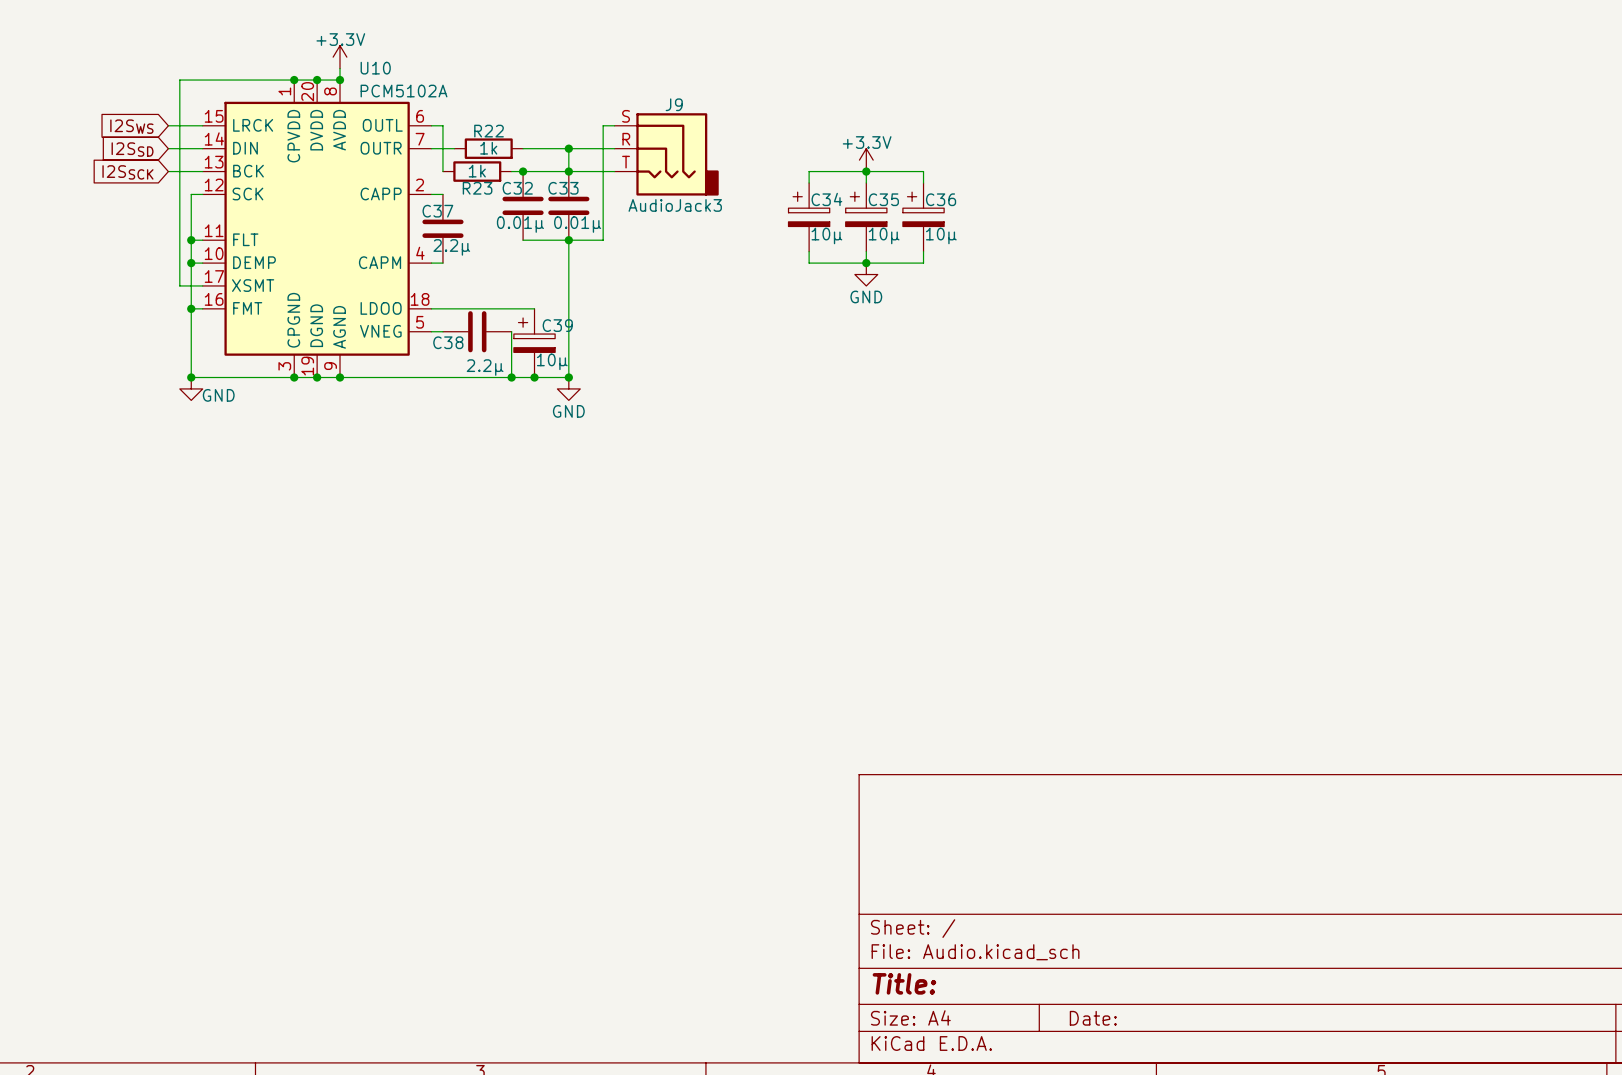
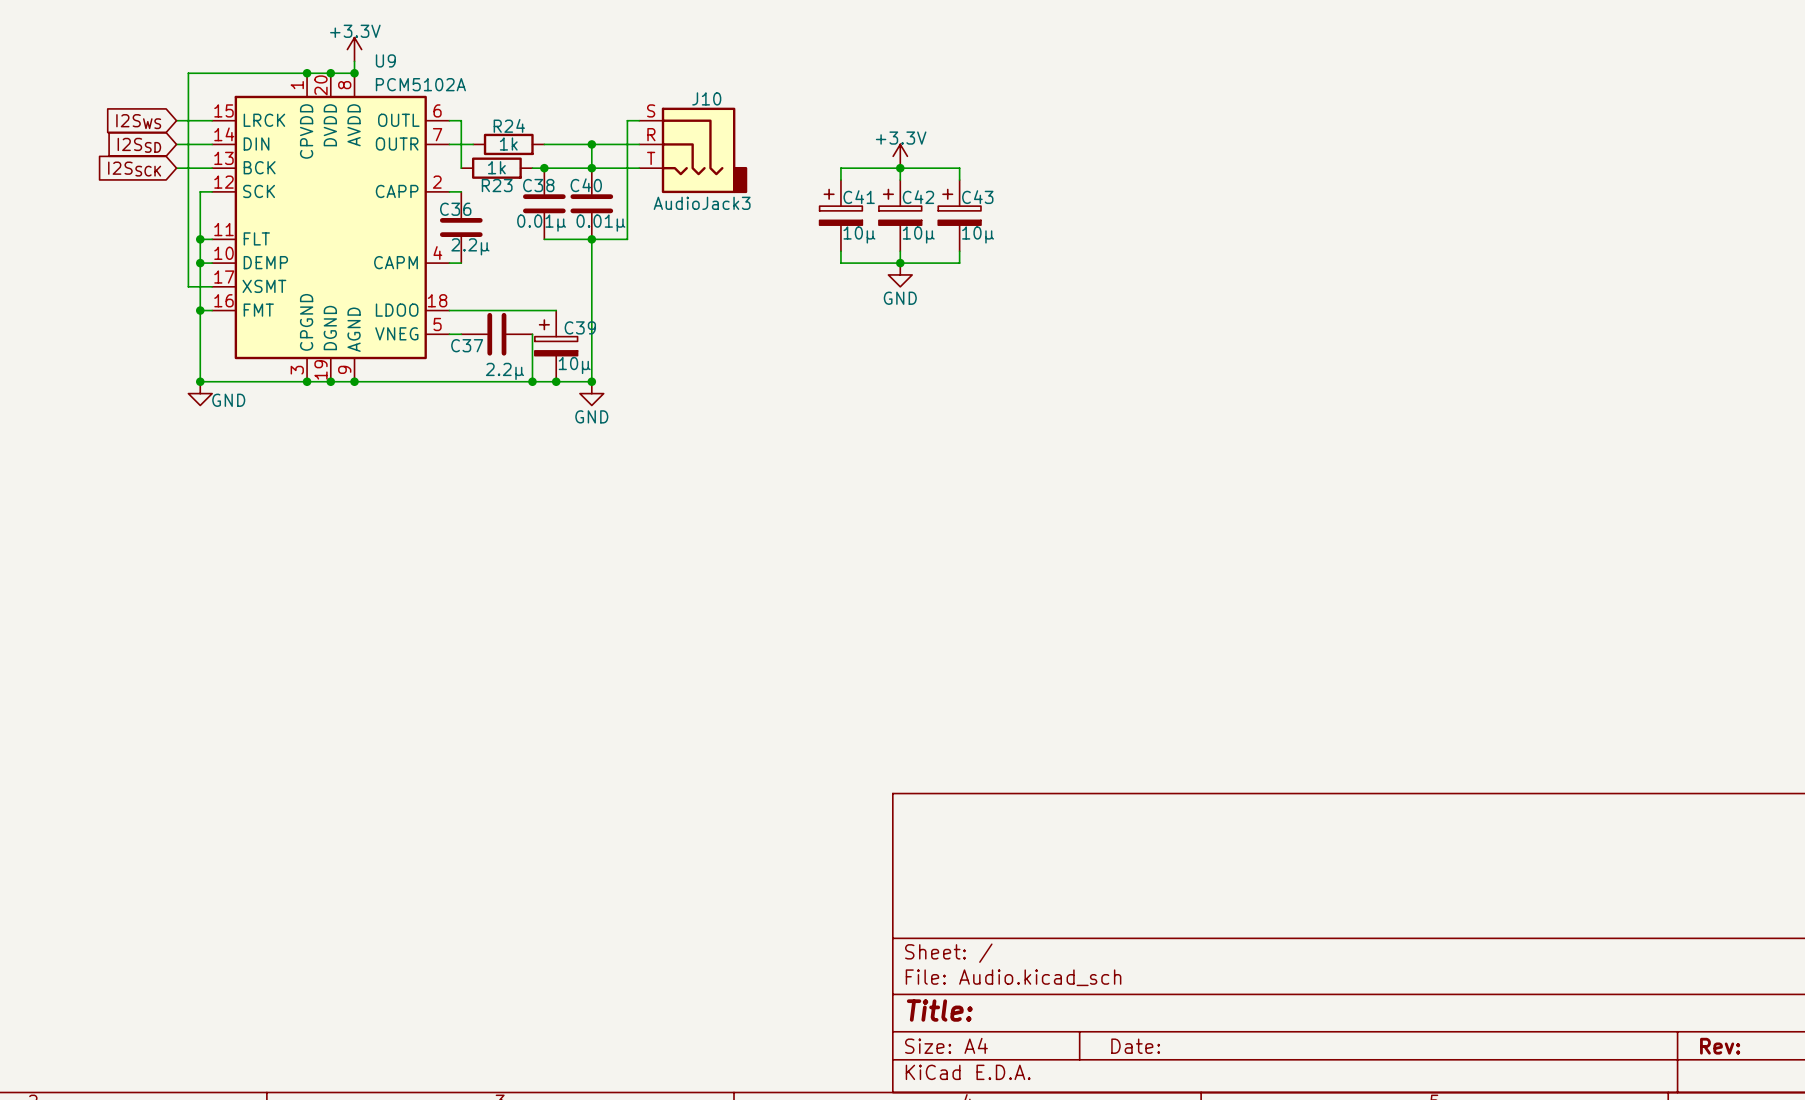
U10 name: U10 (375, 68) -> U9 (385, 60)
J9 name: J9 (674, 104) -> J10 (706, 98)
R22 name: R22 (489, 131) -> R24 (509, 125)
C32 name: C32 (517, 188) -> C38 (538, 185)
C33 name: C33 (563, 188) -> C40 (586, 185)
C34 name: C34 (826, 199) -> C41 (859, 197)
C35 name: C35 (883, 199) -> C42 (918, 197)
C36 name: C36 (941, 199) -> C43 (977, 197)
C37 name: C37 (437, 211) -> C36 (455, 209)
C38 name: C38 (448, 342) -> C37 (467, 345)

